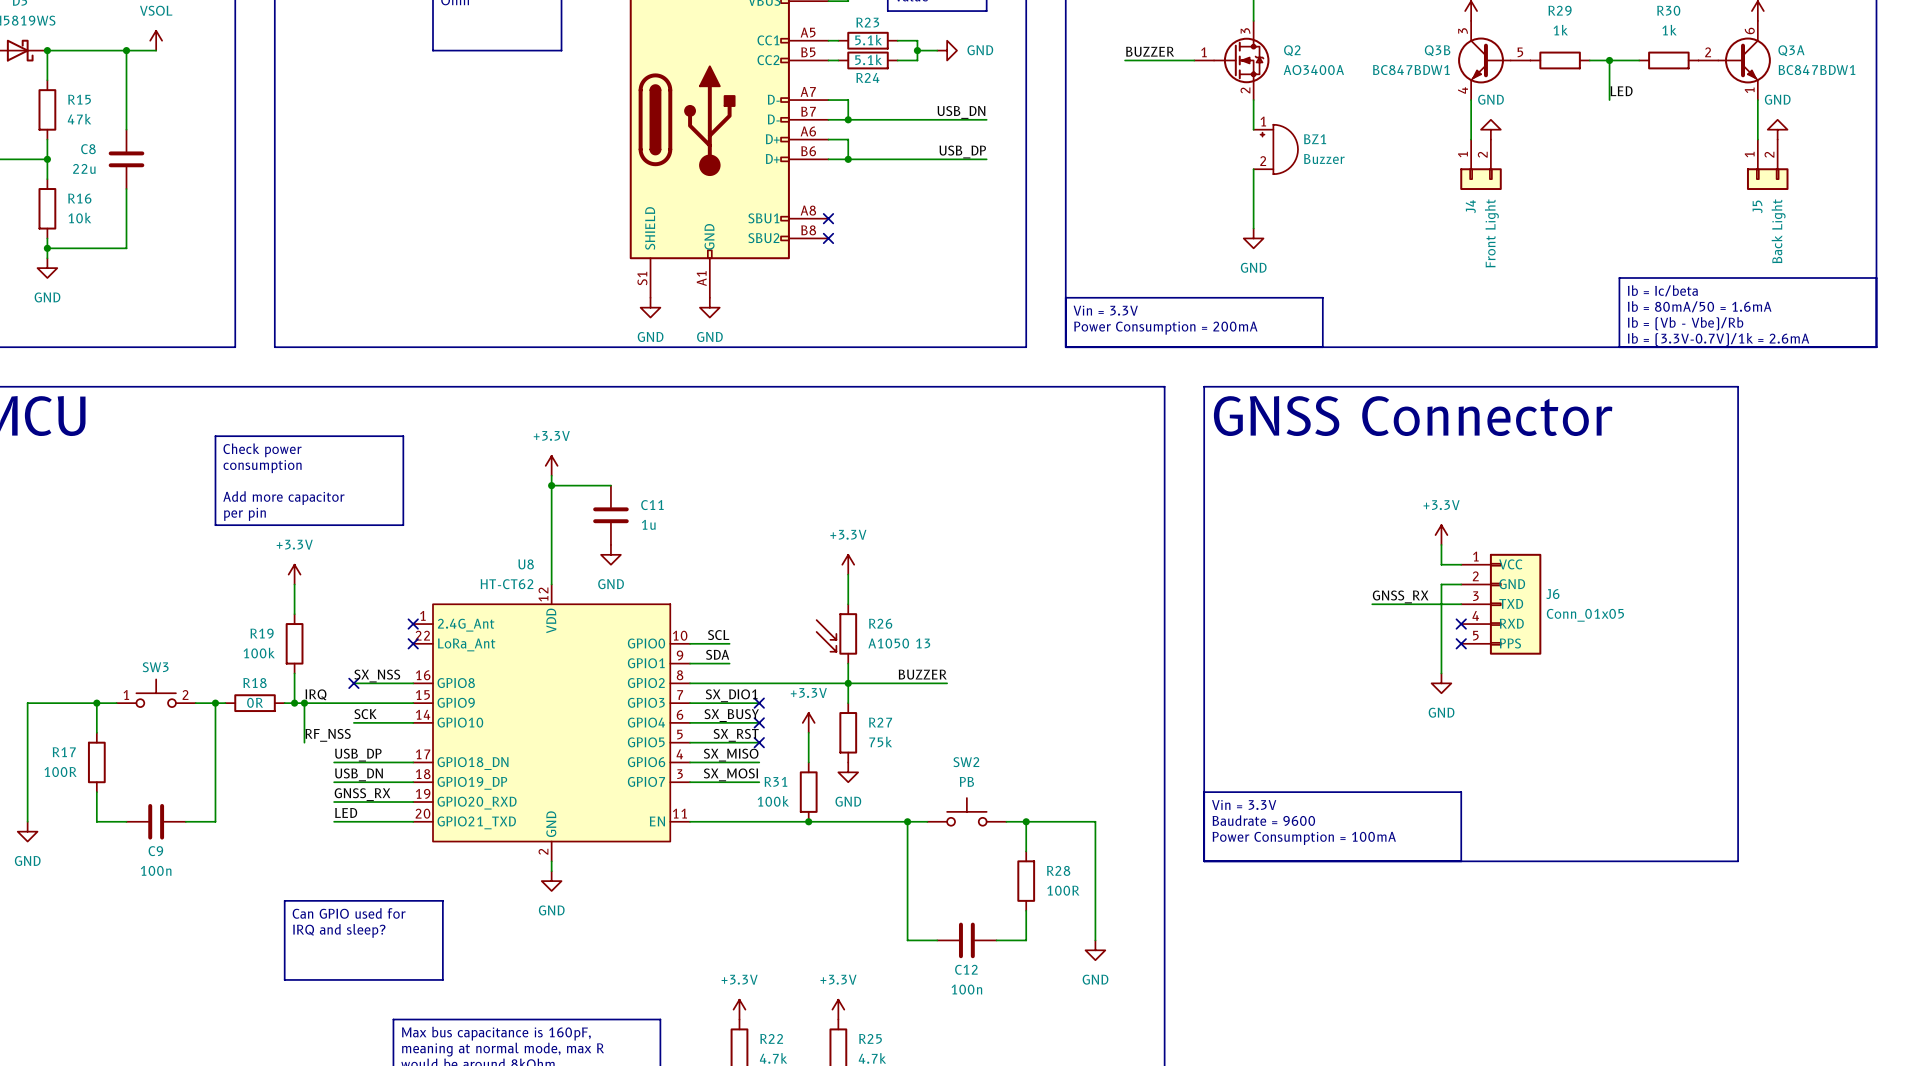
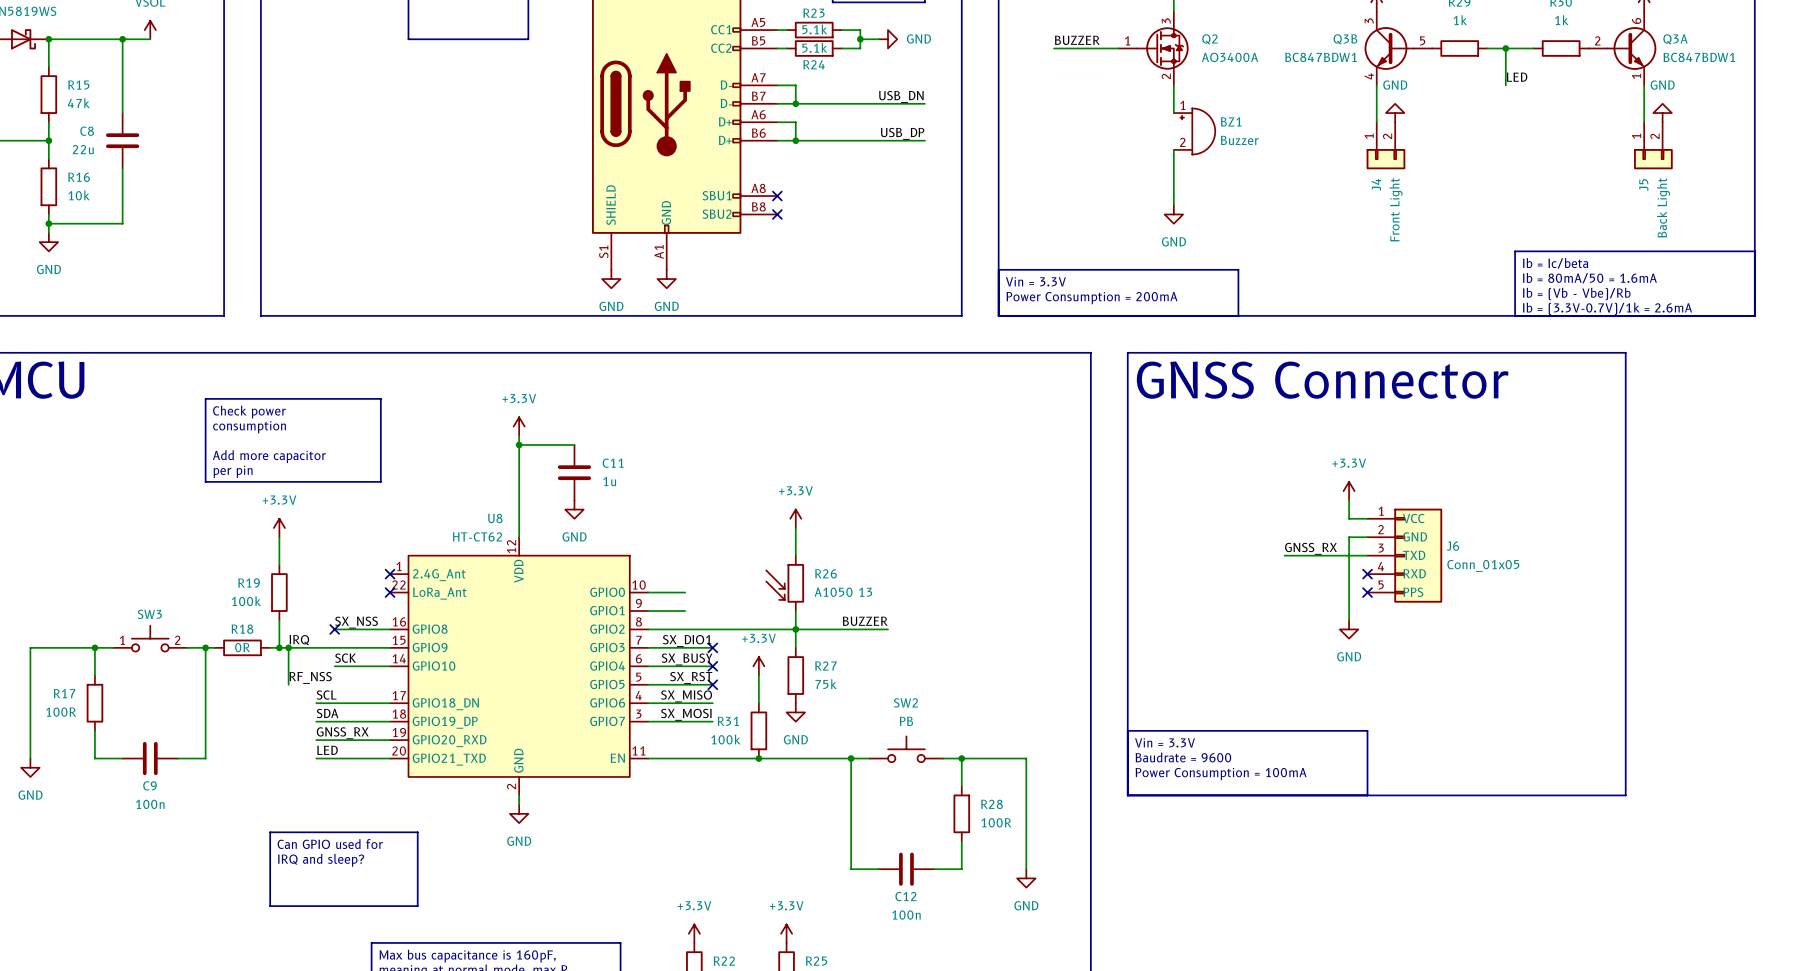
label: SCL (718, 635) -> none
label: SDA (717, 654) -> none
label: USB_DP (358, 755) -> SCL (326, 695)
label: USB_DN (358, 774) -> SDA (327, 713)

